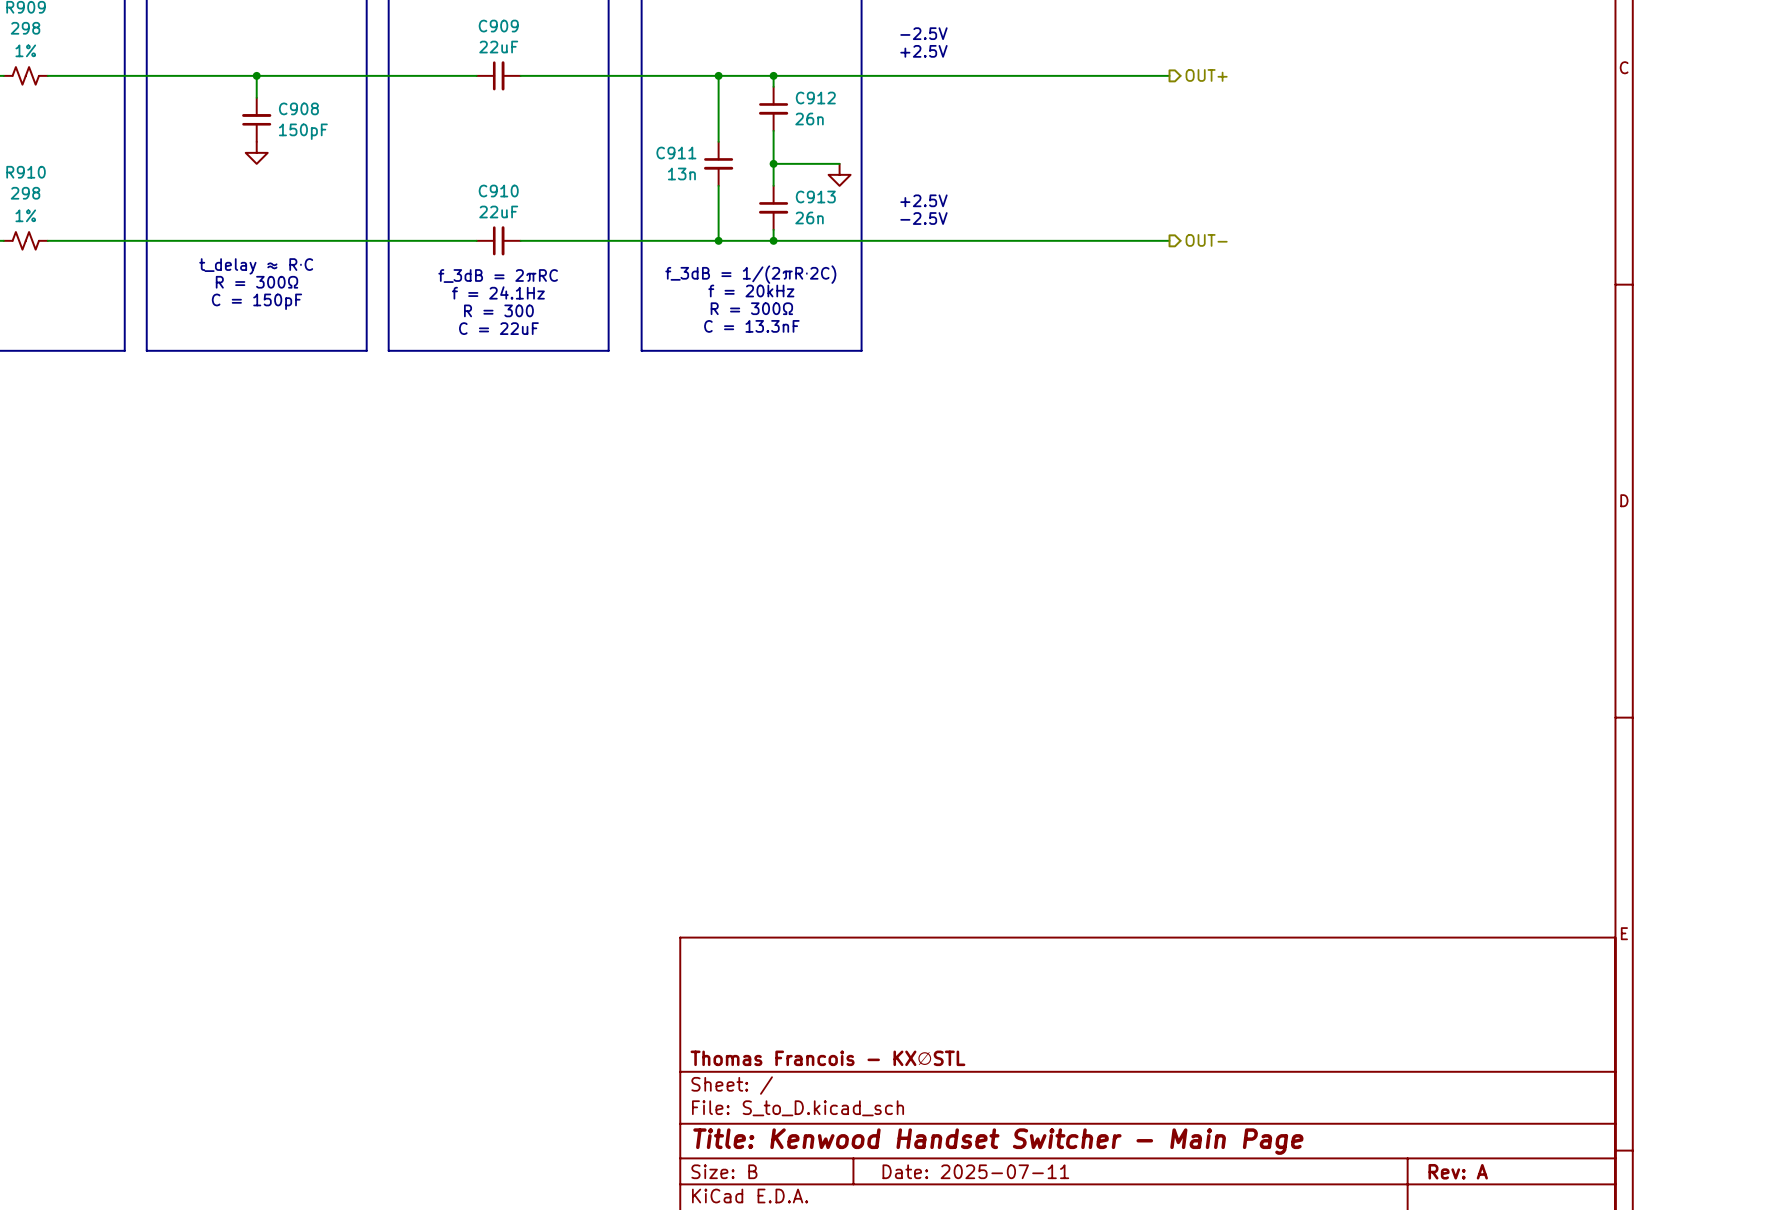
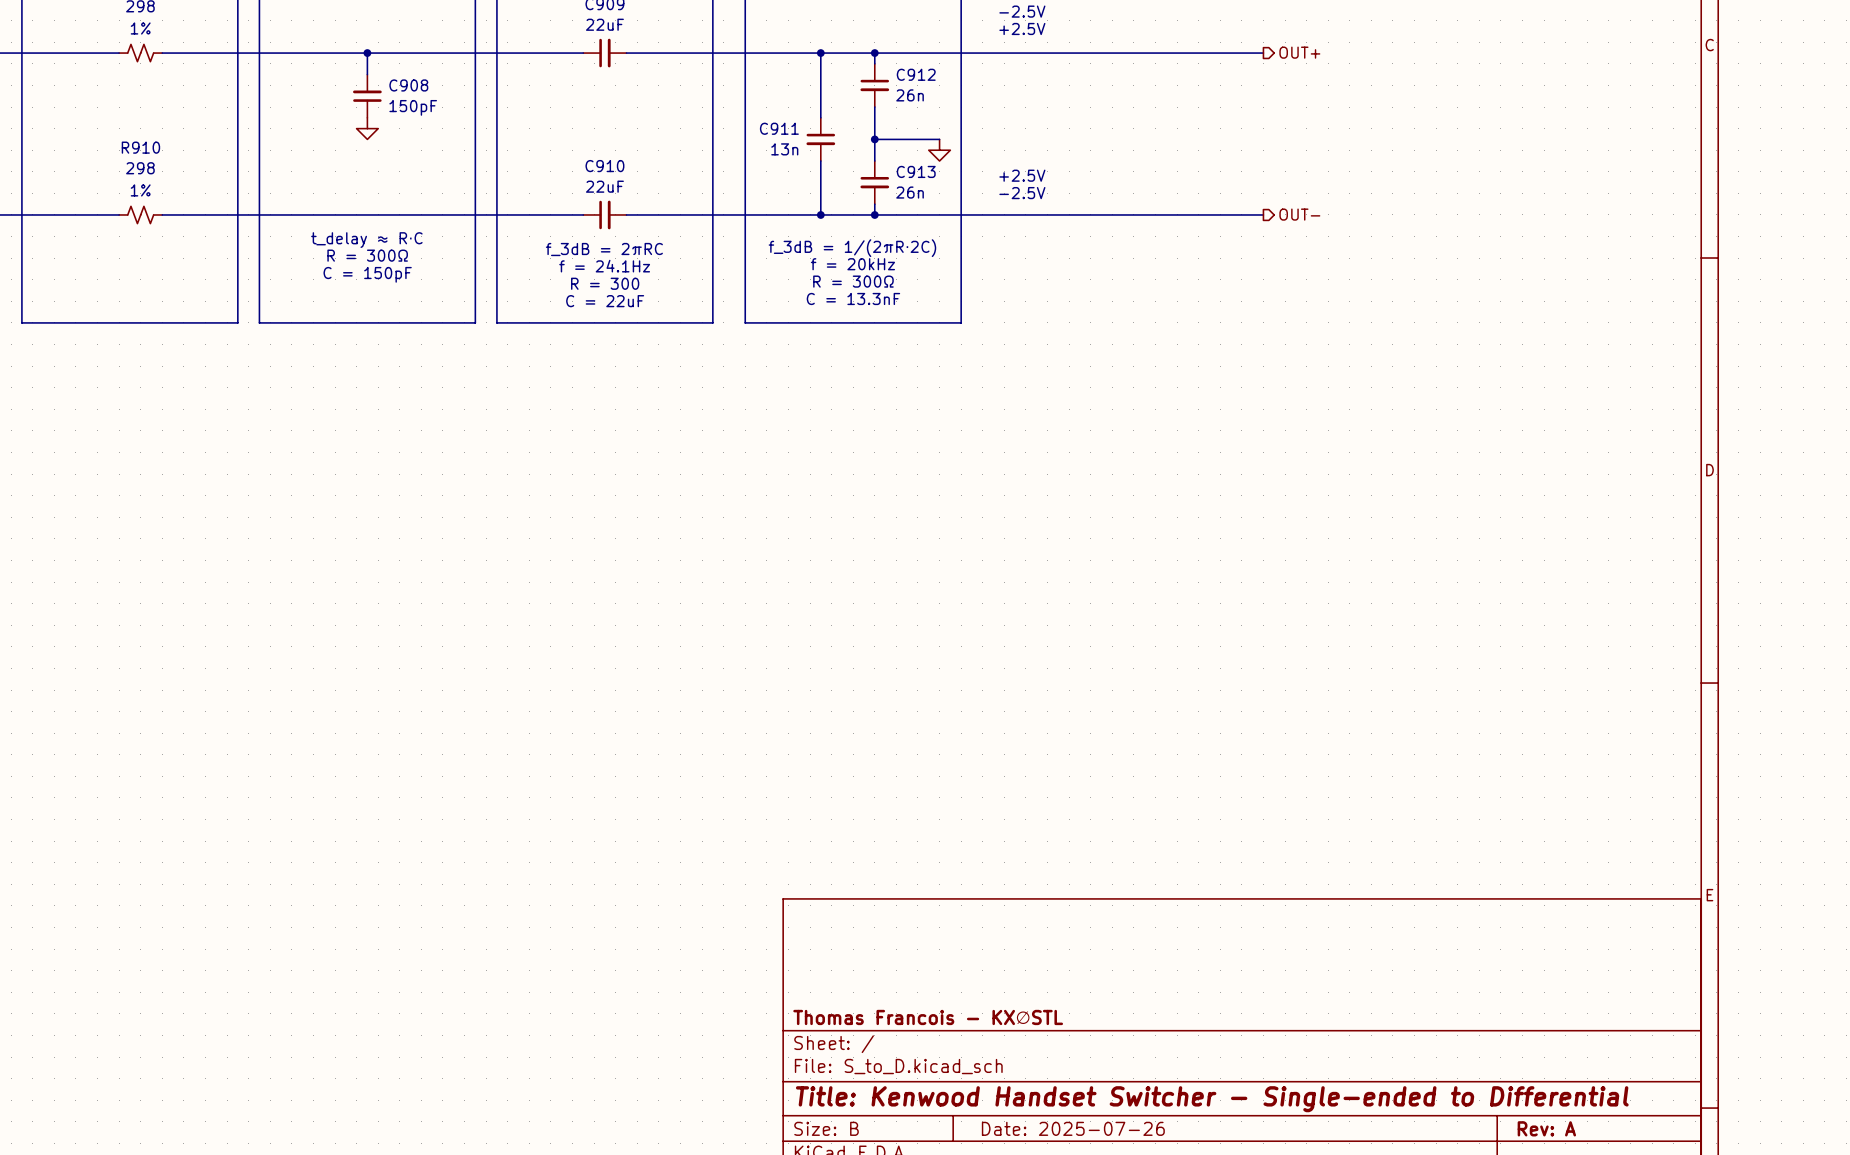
title block: Title: Kenwood Handset Switcher - Main Page (998, 1141) -> Title: Kenwood Handset Switcher - Single-ended to Differential (1212, 1099)
title block: Date: 2025-07-11 (975, 1171) -> Date: 2025-07-26 (1073, 1128)

